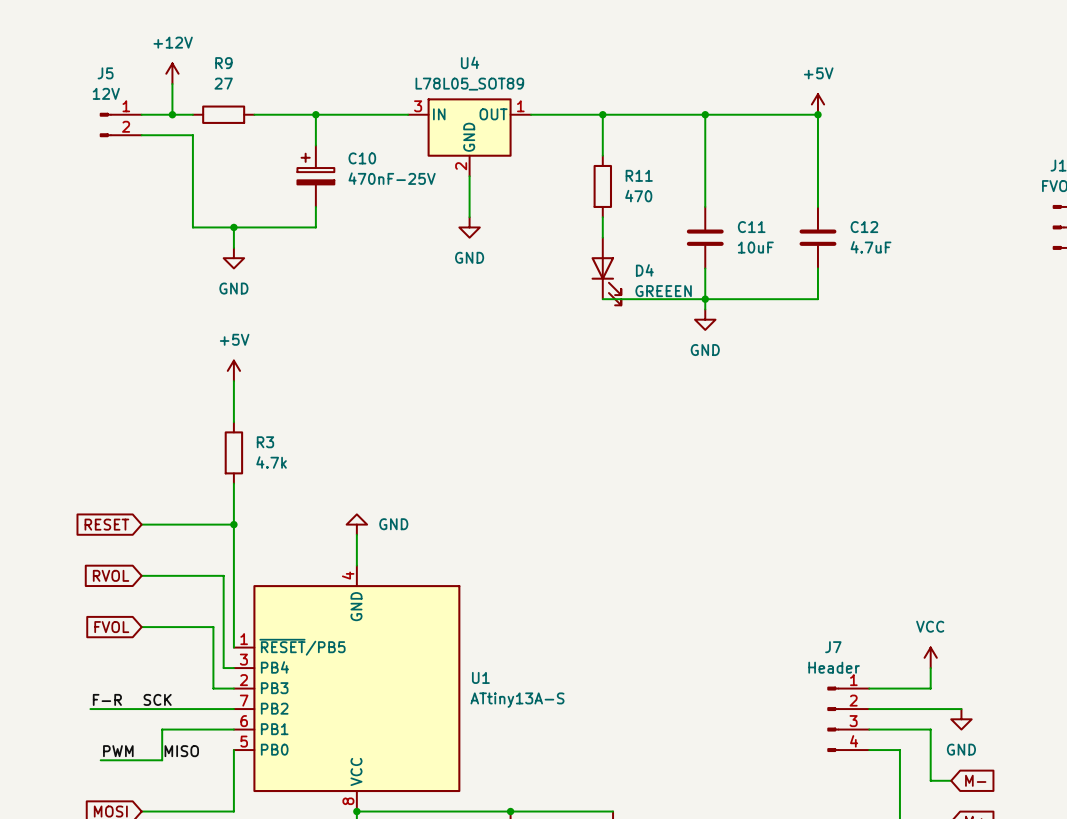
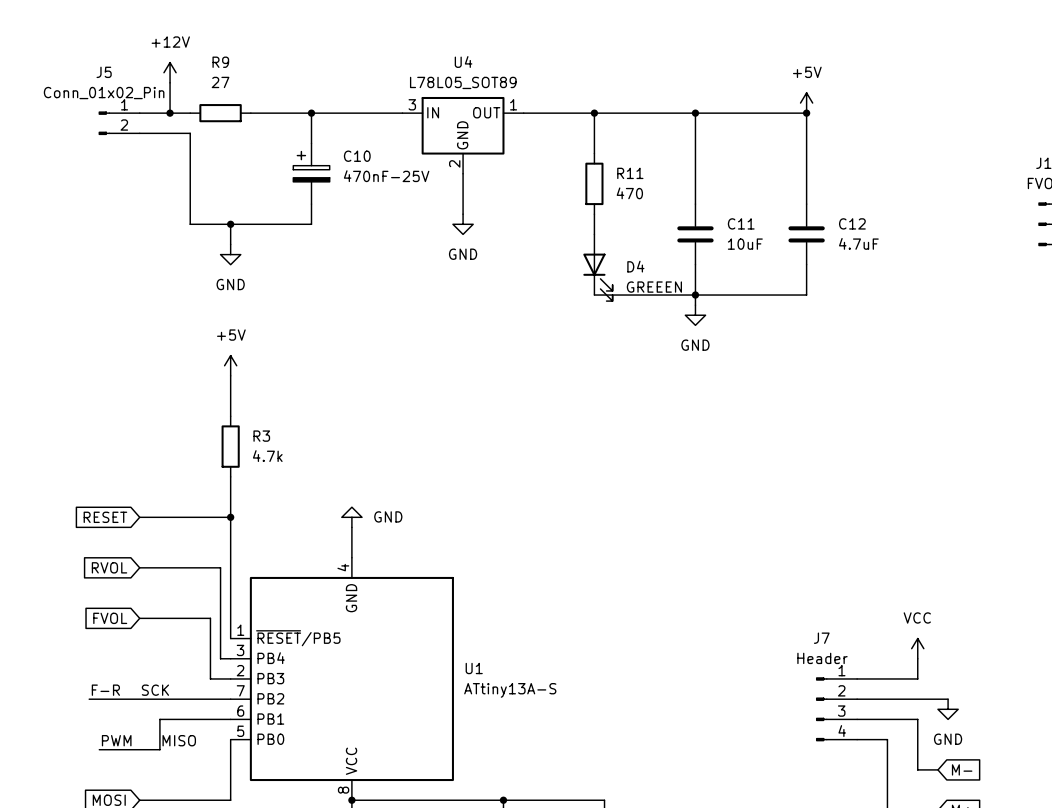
J5 value: 12V (106, 93) -> Conn_01x02_Pin (104, 93)

